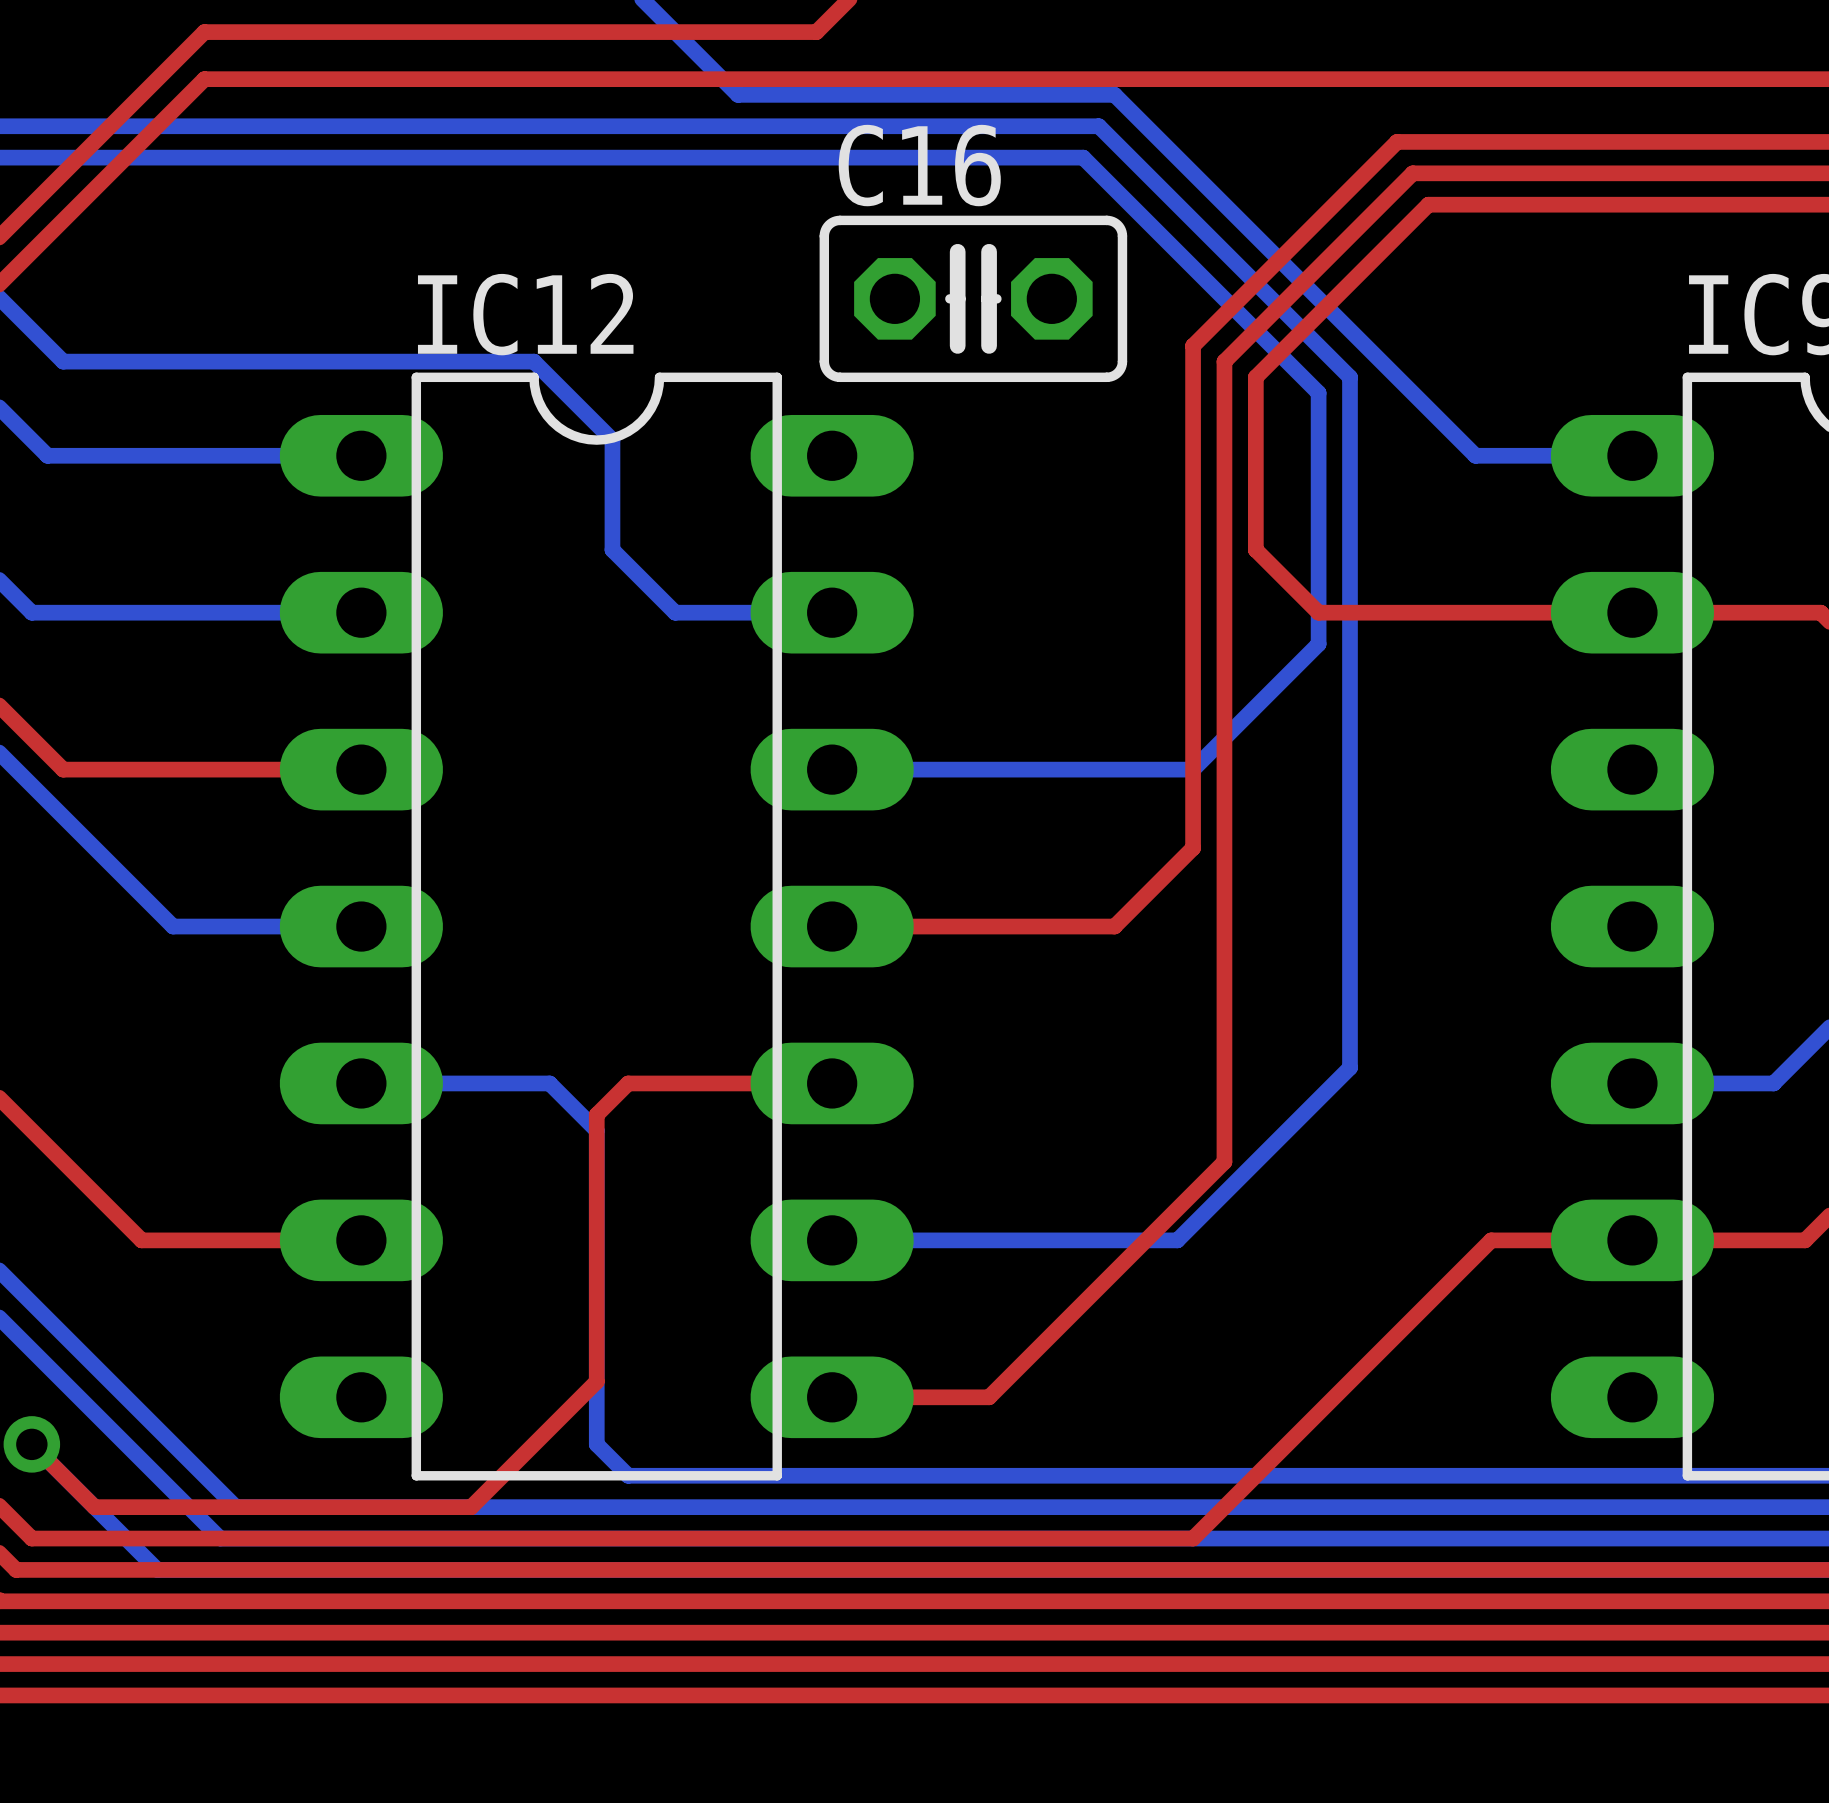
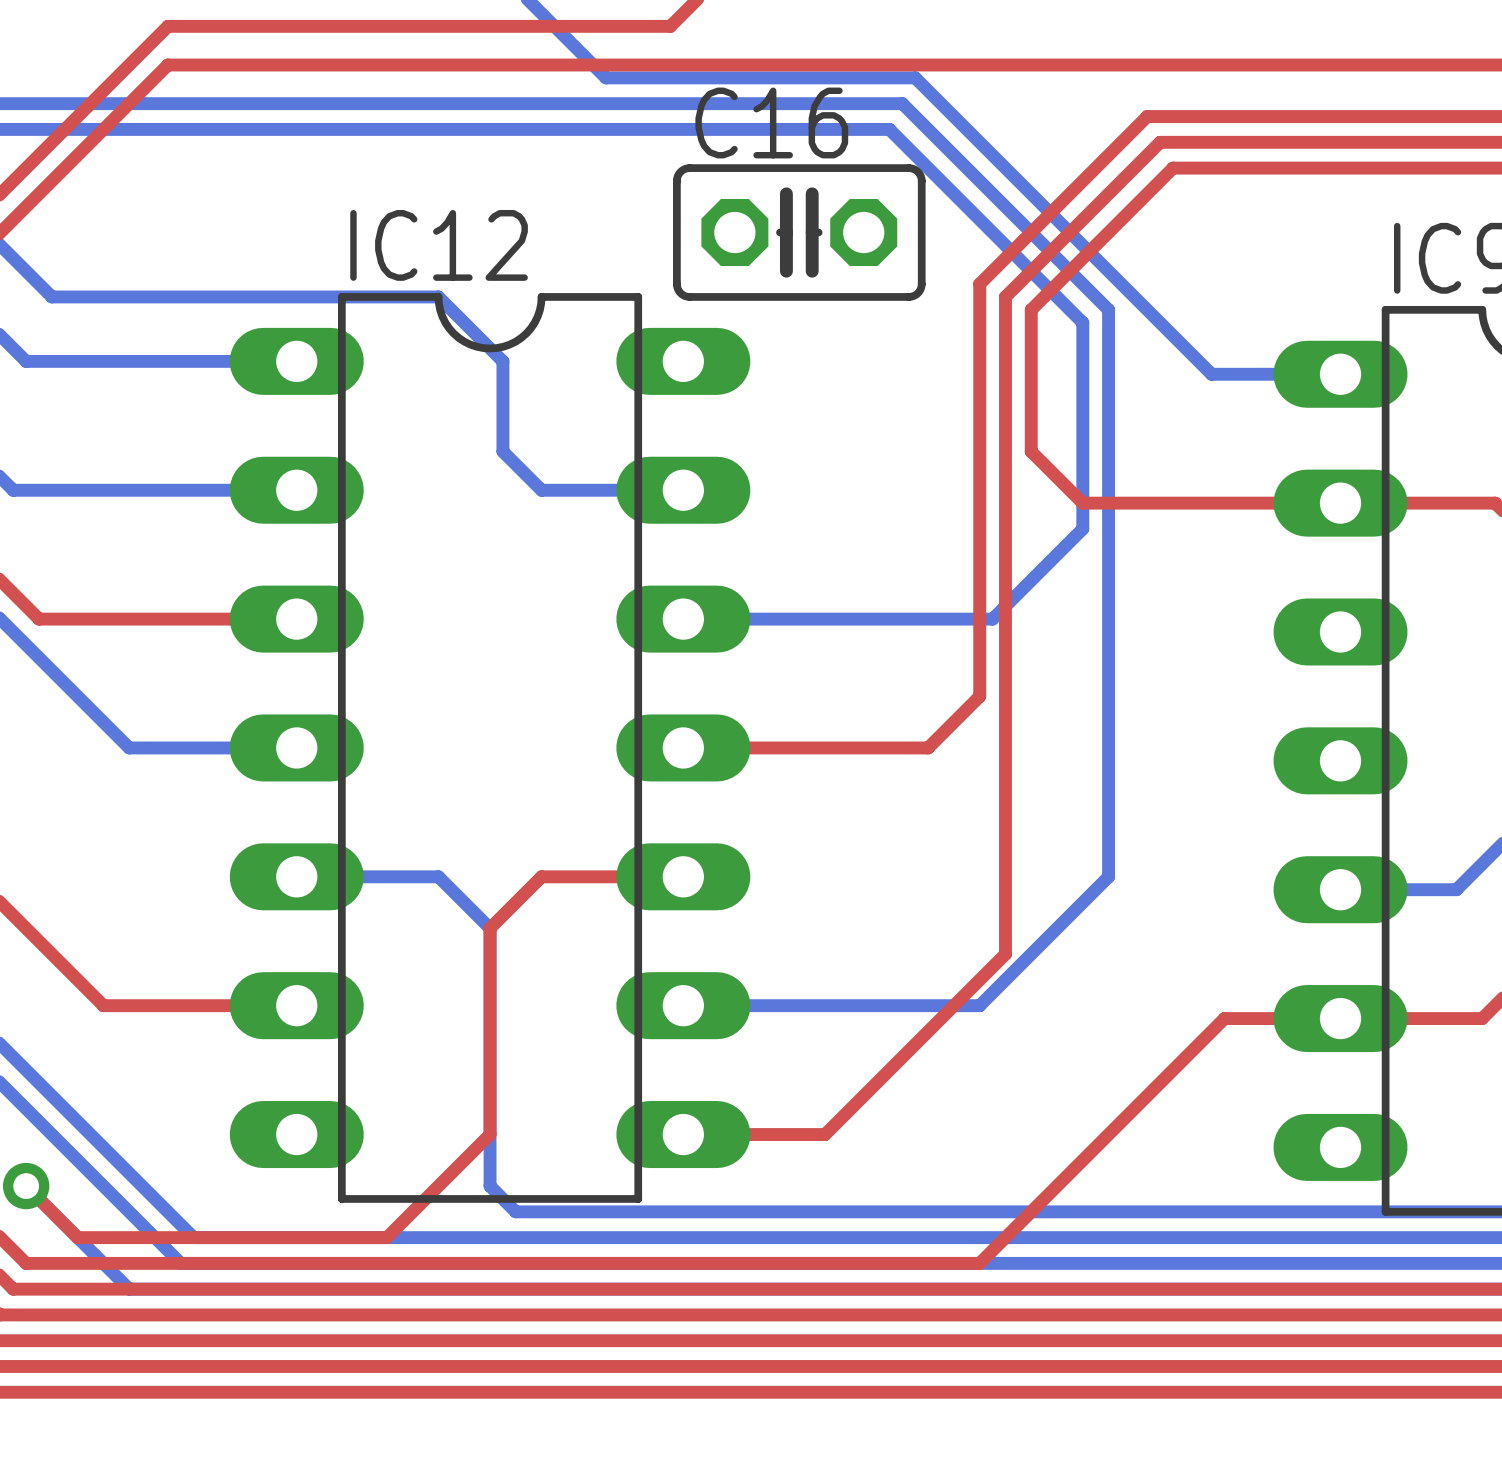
C16 position: (973, 298) -> (799, 232)
bottom track: (31, 440) (47, 455) (361, 455) -> (26, 361) (296, 361)
bottom track: (16, 597) (31, 612) (361, 612) -> (13, 490) (296, 490)
bottom track: (659, 597) (675, 612) (832, 612) -> (541, 490) (683, 490)
top track: (47, 753) (63, 769) (361, 769) -> (39, 619) (296, 619)
bottom track: (1208, 753) (1193, 769) (832, 769) -> (992, 619) (683, 619)
bottom track: (157, 910) (173, 926) (361, 926) -> (129, 747) (296, 747)
top track: (1130, 910) (1114, 926) (832, 926) -> (928, 747) (683, 747)
IC12 position: (596, 926) -> (490, 747)
bottom track: (361, 1083) (549, 1083) -> (296, 876) (438, 876) (451, 889)
top track: (832, 1083) (628, 1083) (596, 1114) (596, 1130) -> (683, 876) (541, 876) (490, 928)
top track: (126, 1224) (141, 1240) (361, 1240) -> (103, 1005) (296, 1005)
bottom track: (1193, 1224) (1177, 1240) (832, 1240) -> (979, 1005) (683, 1005)
top track: (1004, 1381) (989, 1397) (832, 1397) -> (825, 1134) (683, 1134)

